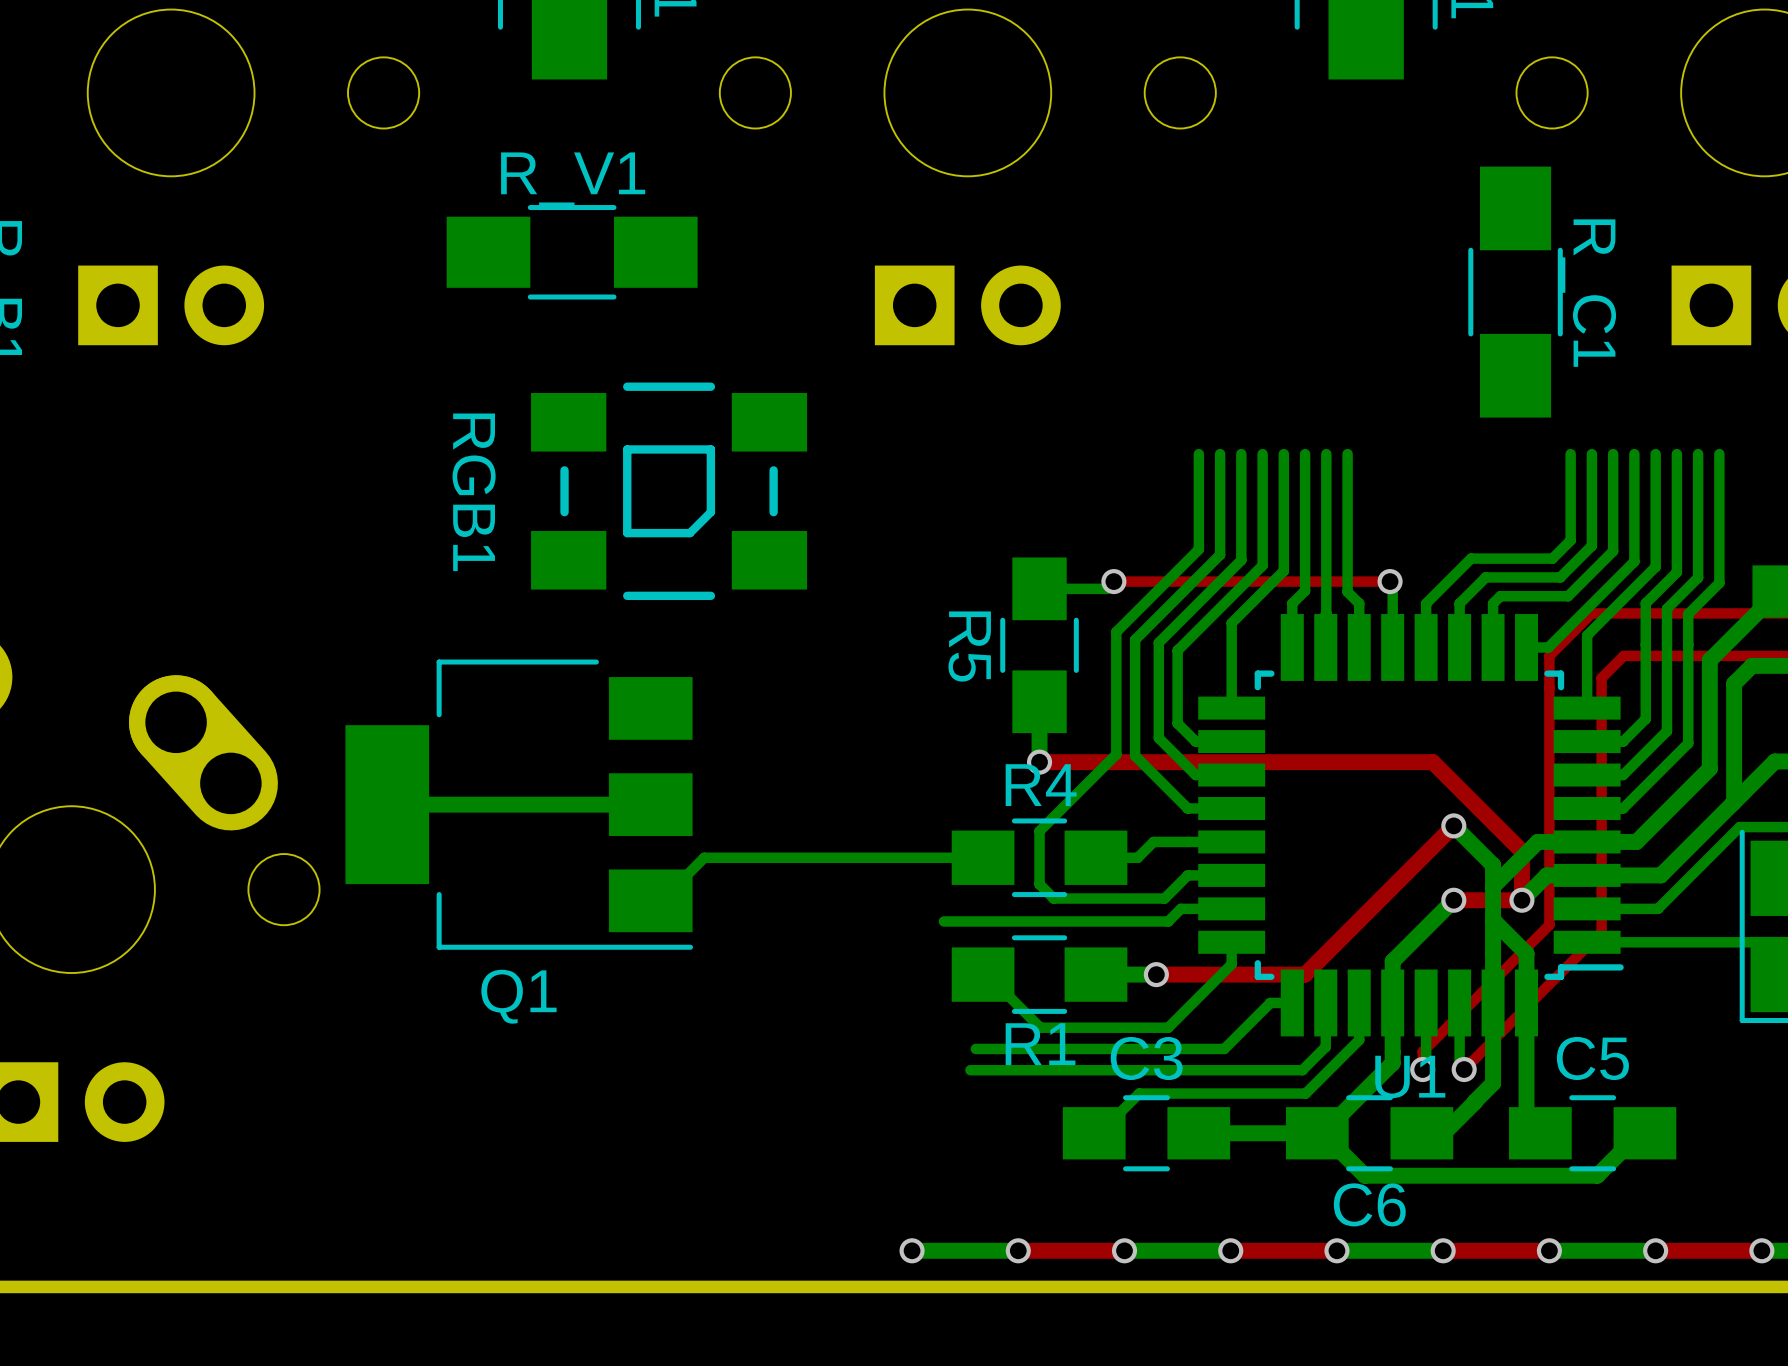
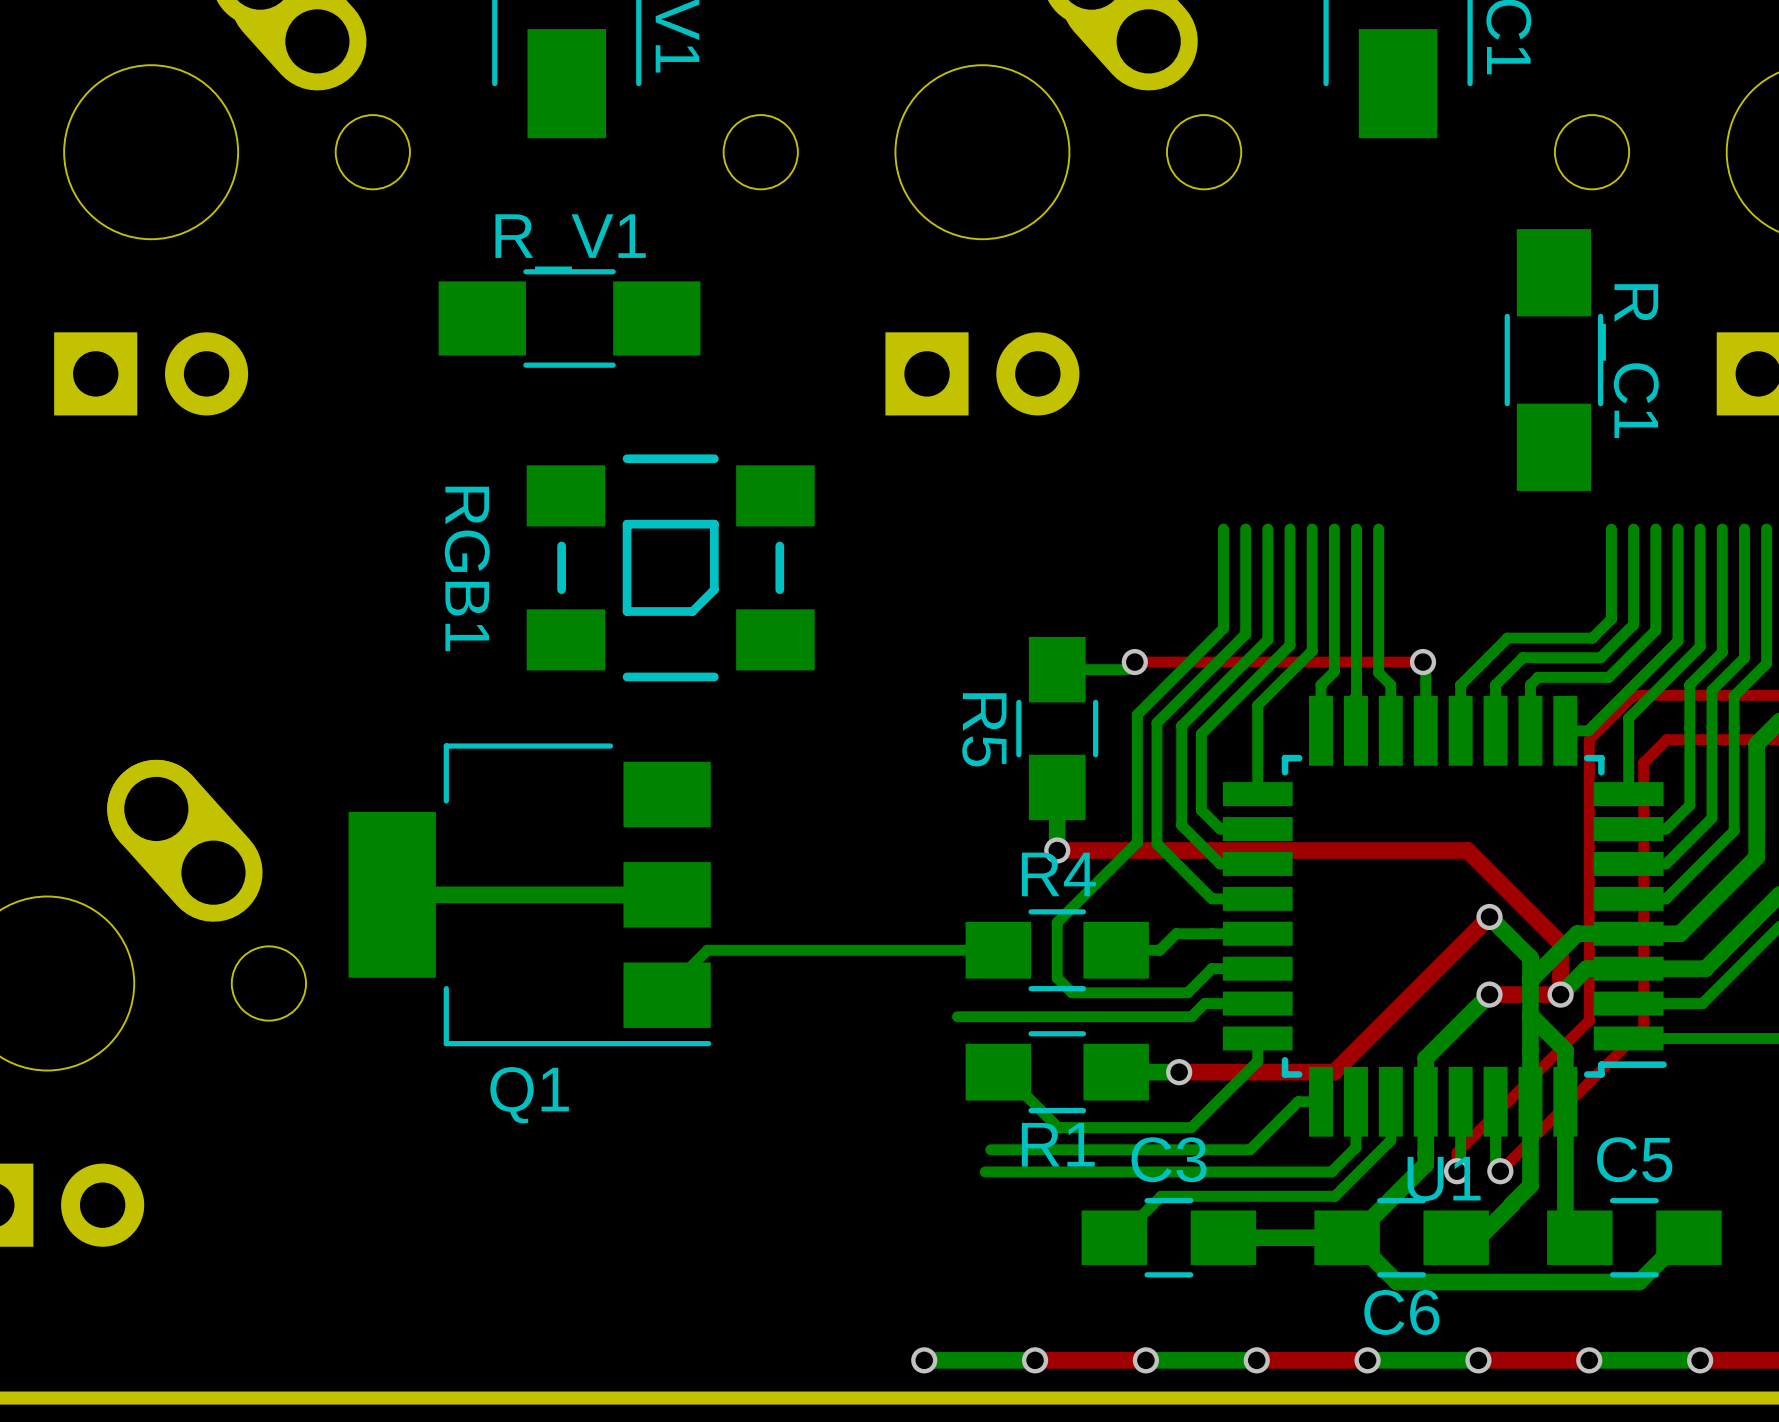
Q1 position: (519, 804) -> (529, 894)

